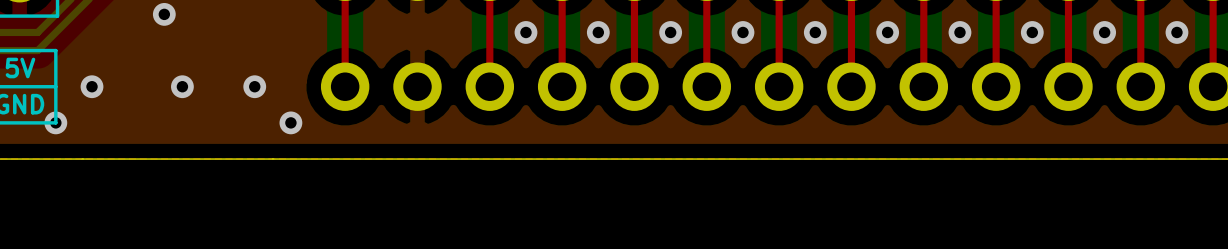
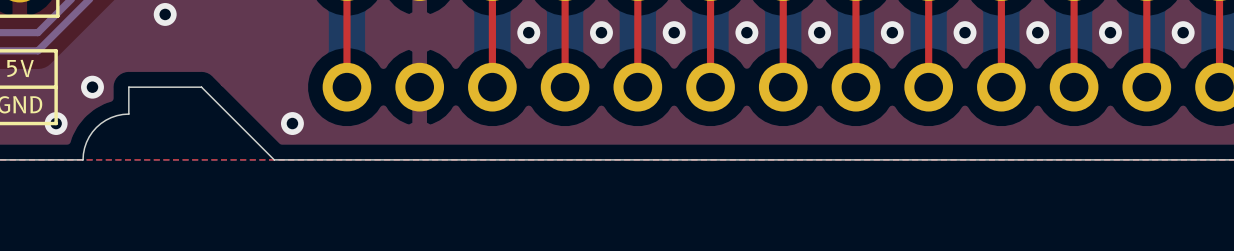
via: (182, 86) -> none
via: (254, 86) -> none
board edge: (82, 159) (272, 159) -> (83, 159) (86, 142) (96, 127) (111, 117) (128, 114) (128, 87) (201, 87) (274, 159)

